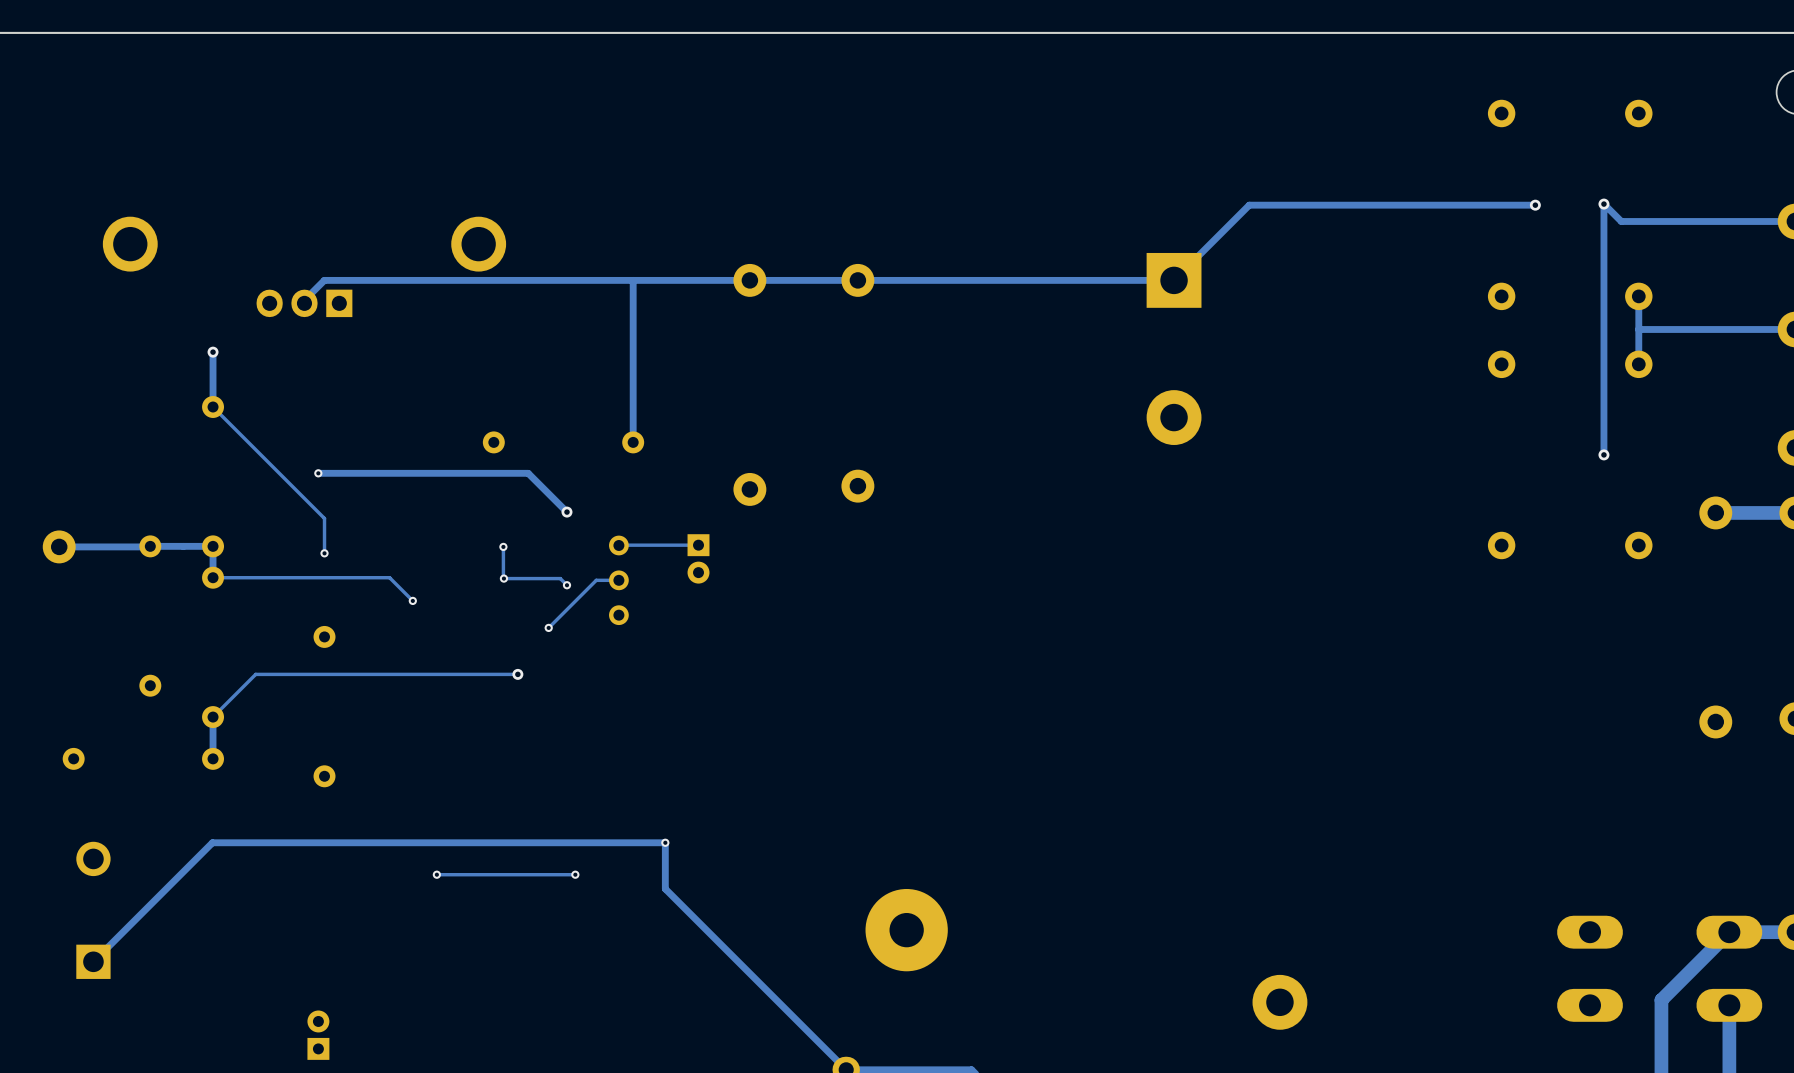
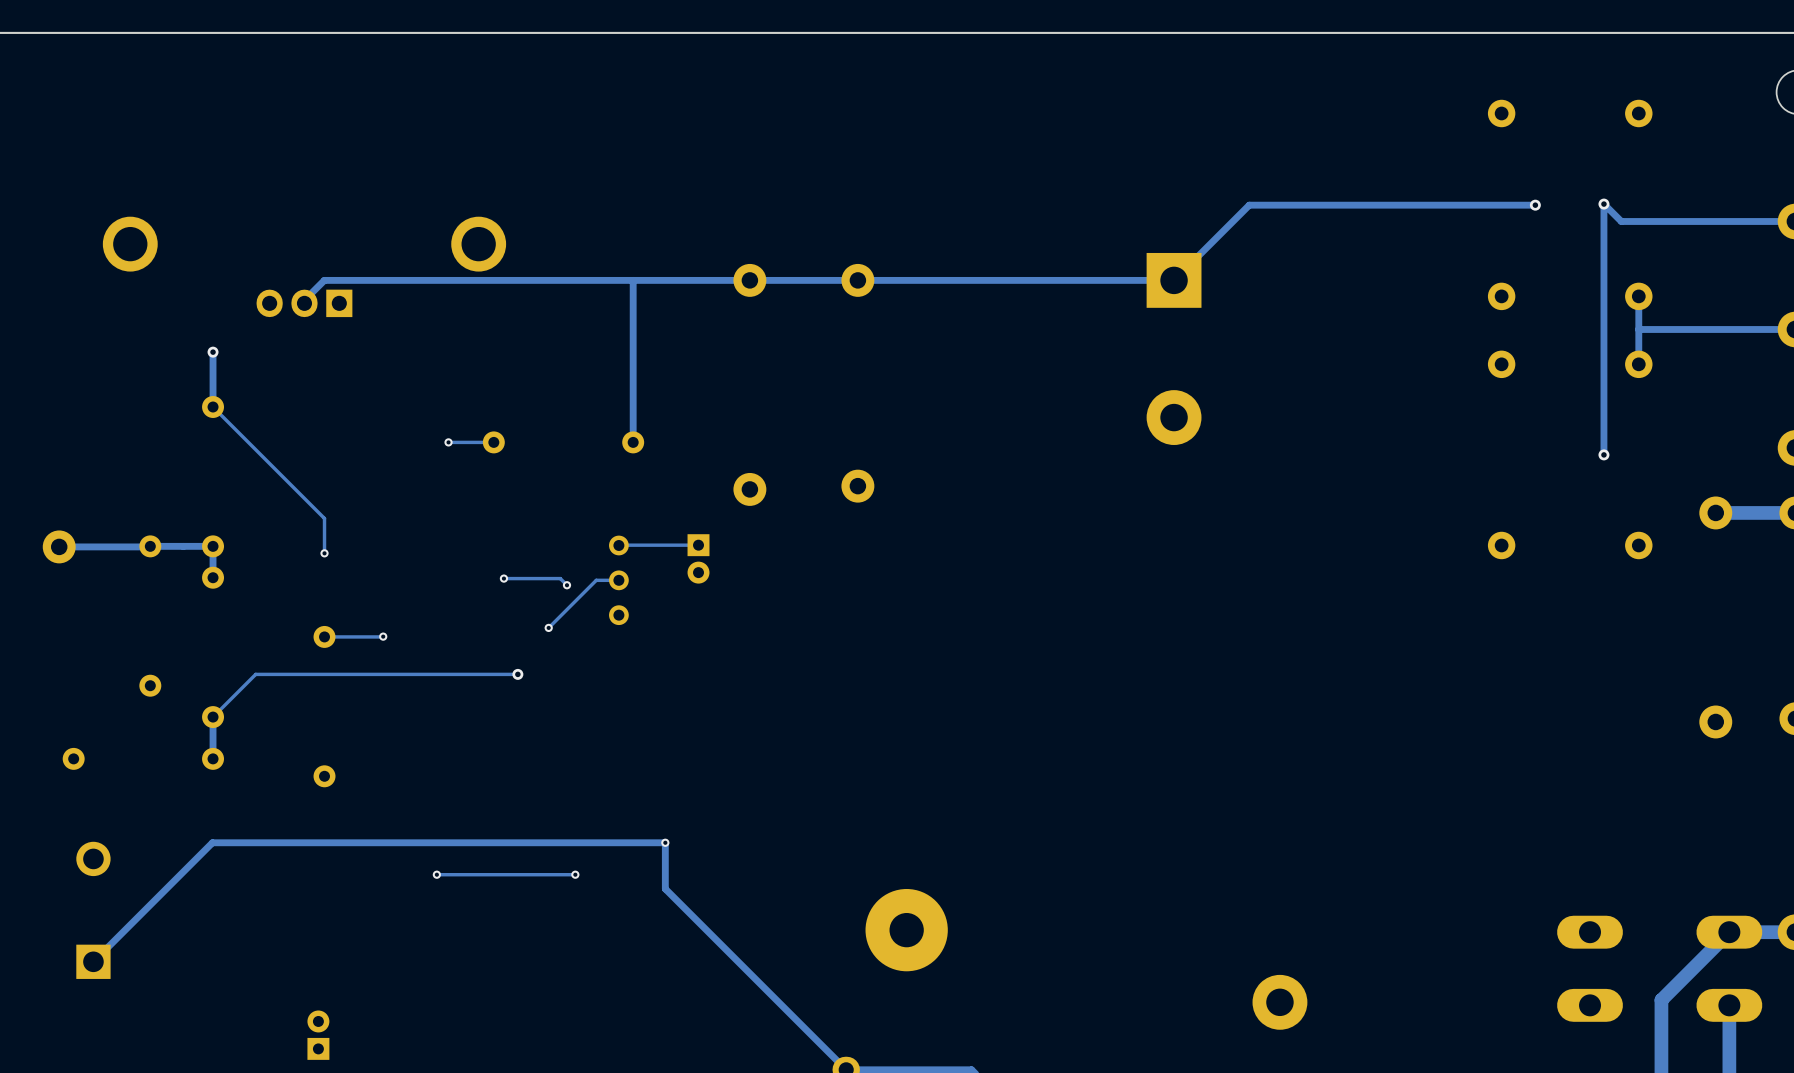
via: none -> (448, 442)
track: none -> (493, 442) (448, 442)
track: (318, 473) (528, 473) (566, 512) -> none
via: (318, 473) -> none
via: (566, 512) -> none
track: (503, 546) (503, 578) -> none
via: (503, 546) -> none
track: (213, 577) (389, 577) (412, 600) -> none
via position: (412, 600) -> (383, 636)
track: none -> (383, 636) (324, 636)

